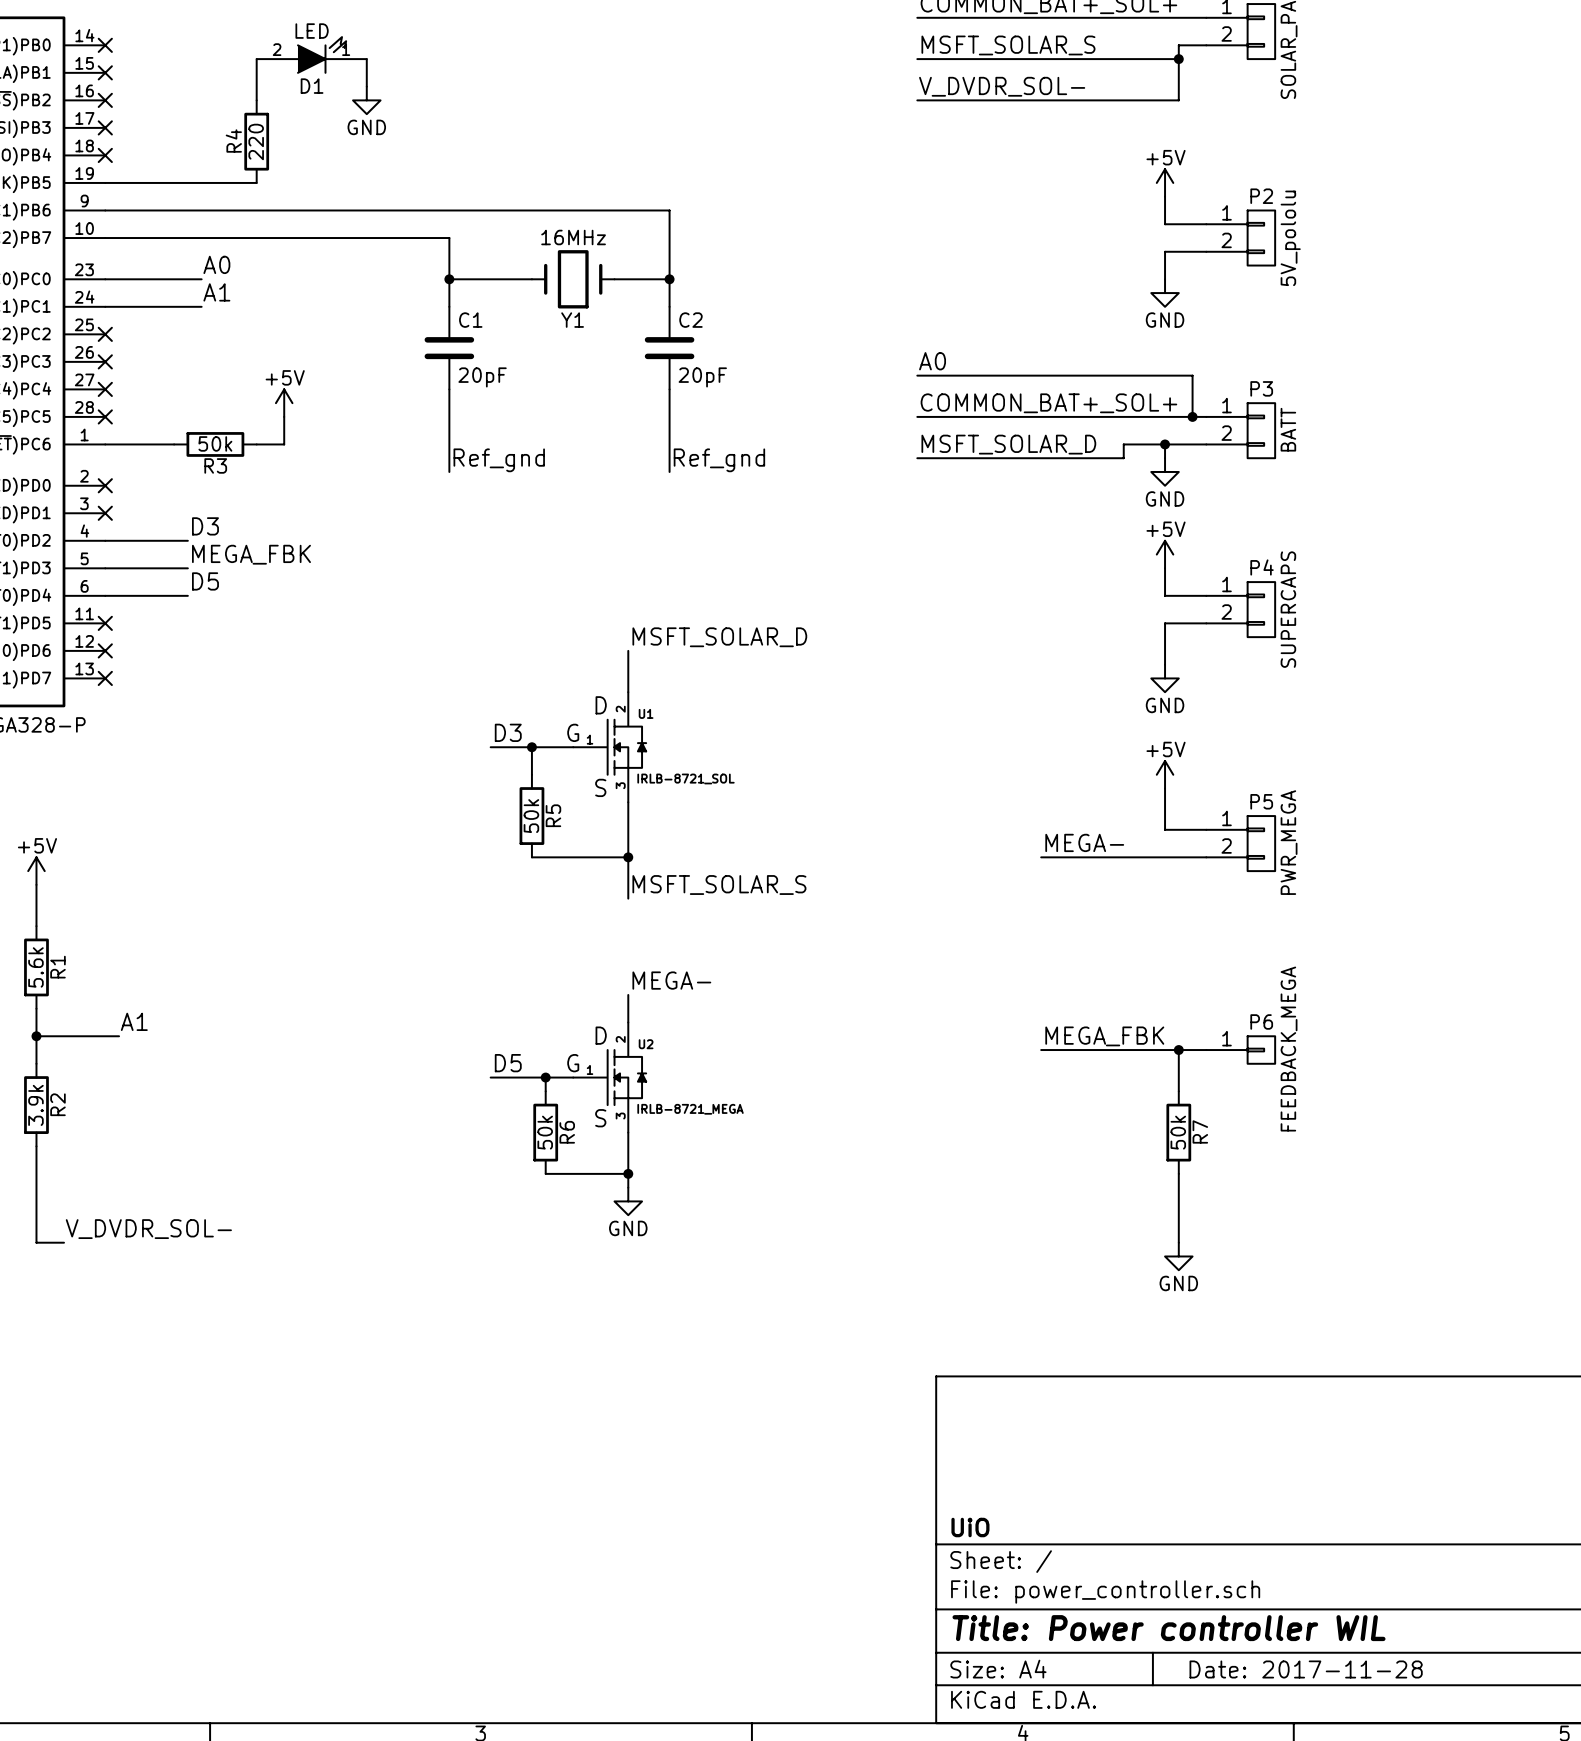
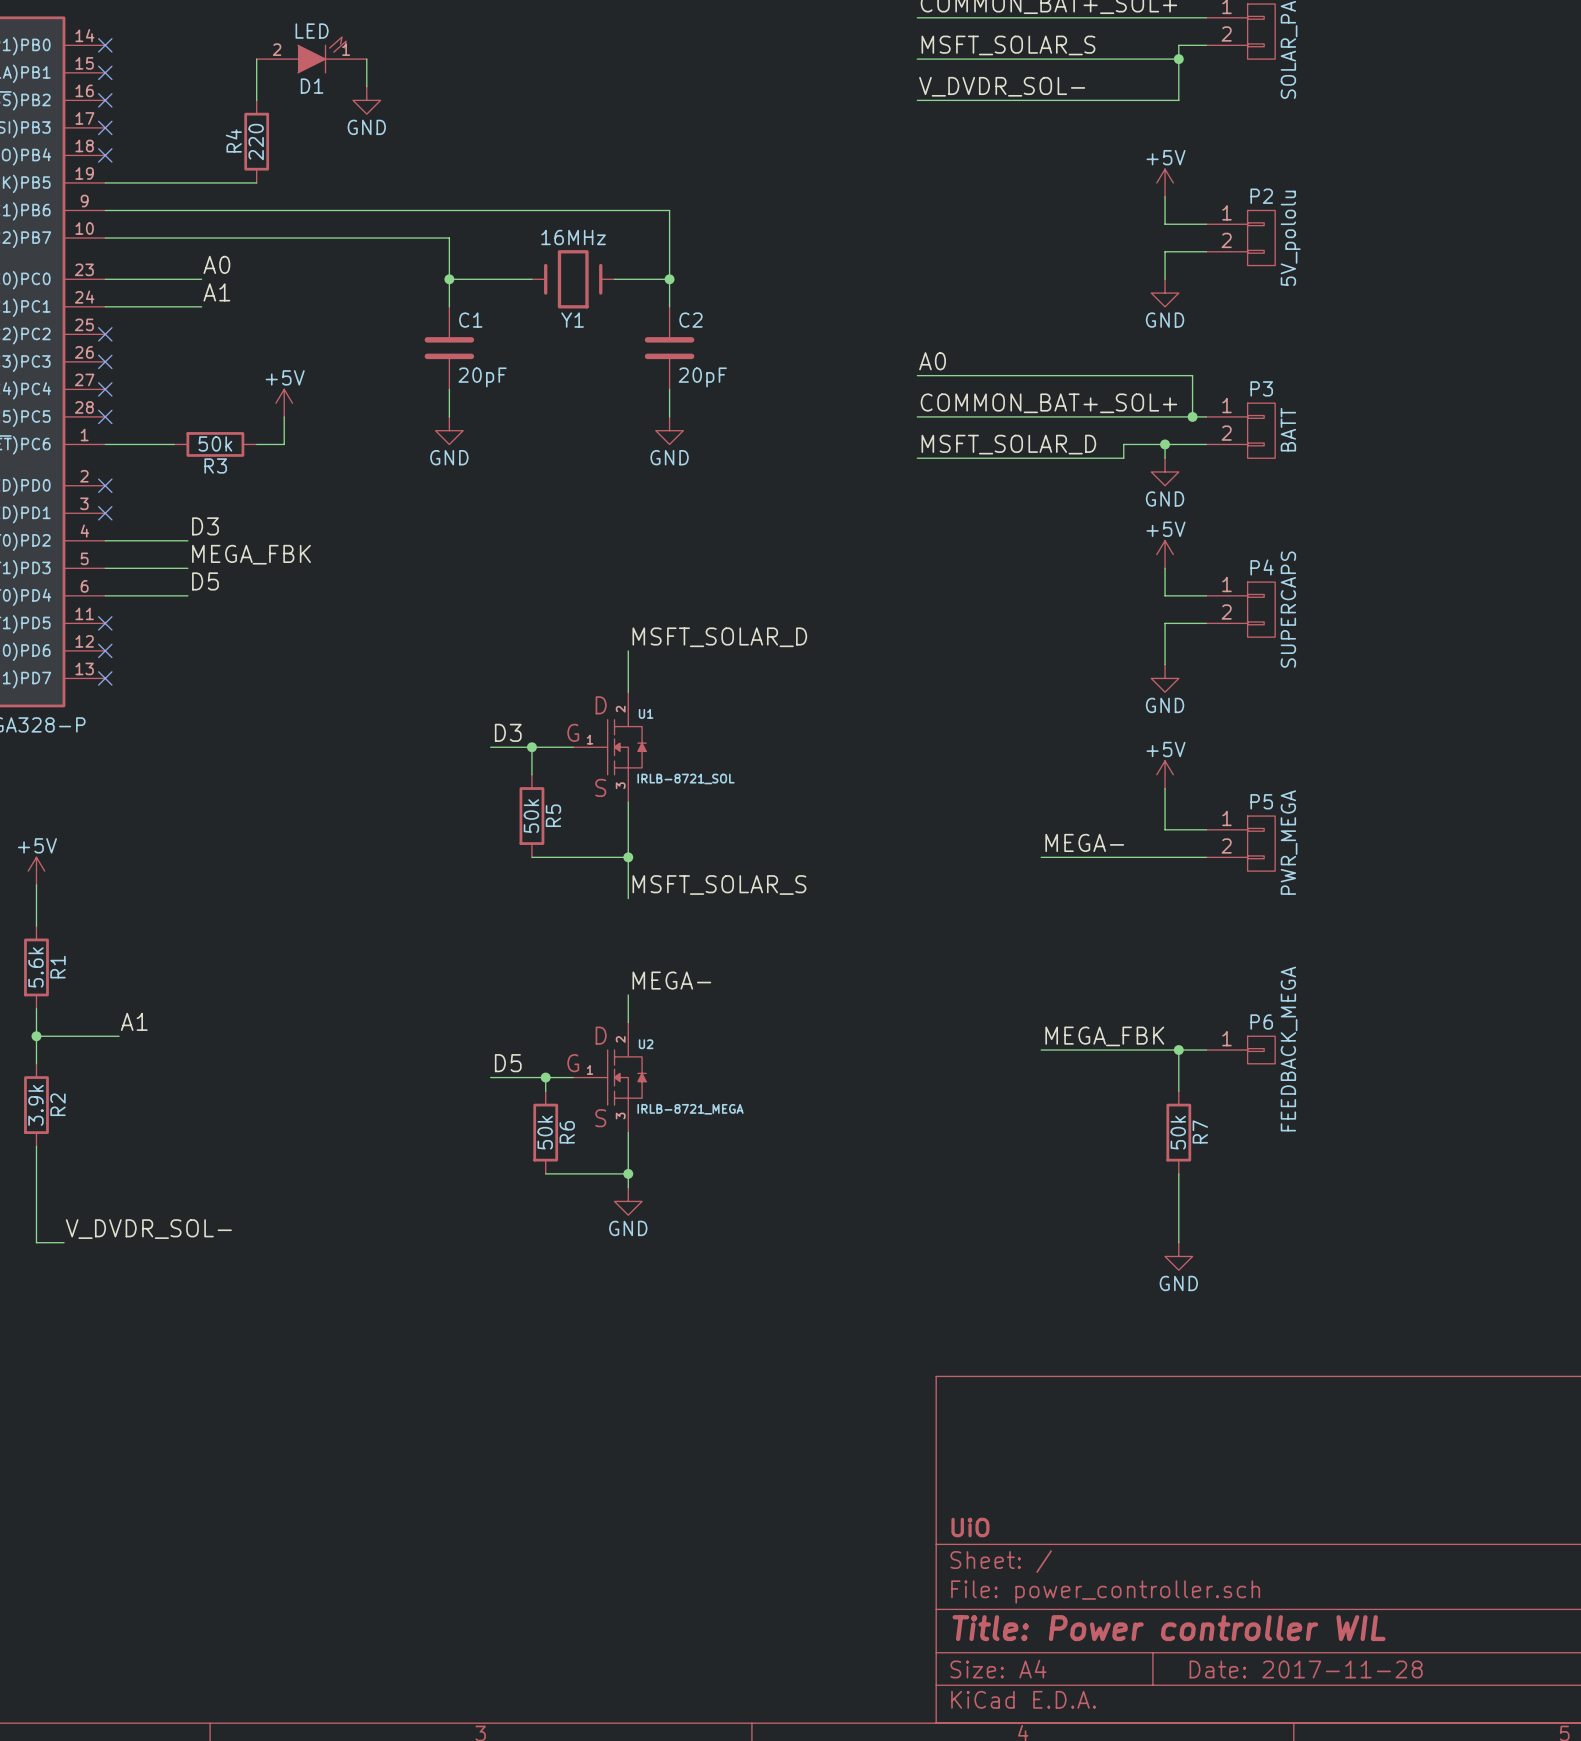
wire: (449, 416) (449, 471) -> none
wire: (669, 416) (669, 471) -> none
power symbol: none -> GND (449, 430)
power symbol: none -> GND (669, 430)
label: Ref_gnd (499, 460) -> none
label: Ref_gnd (719, 460) -> none

